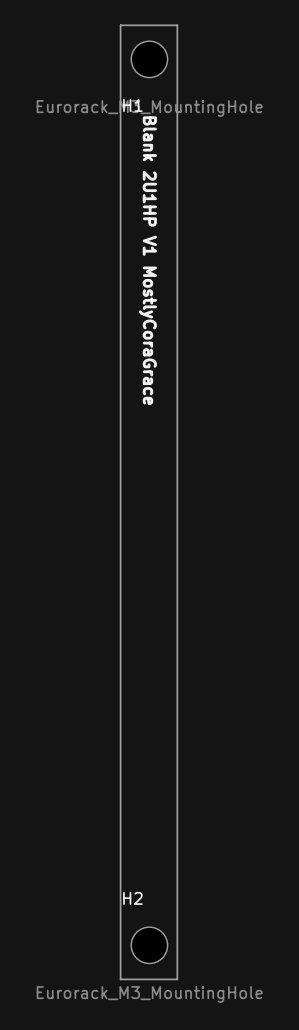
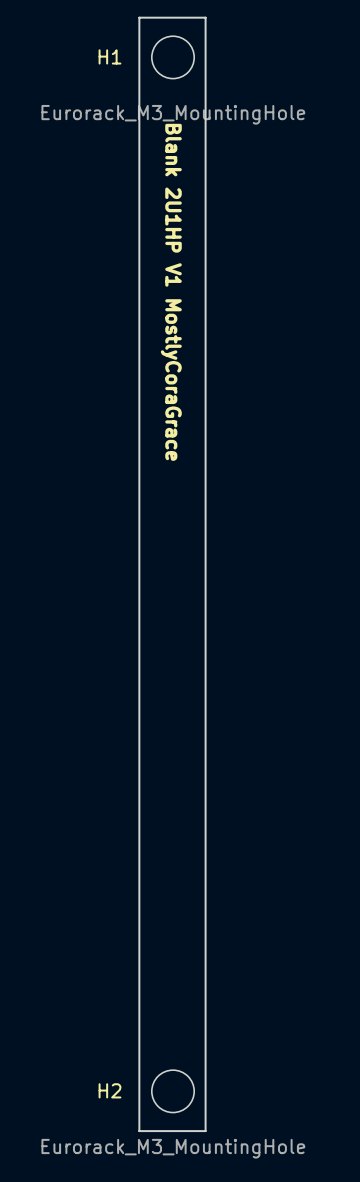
H1 name position: H1 (132, 105) -> H1 (109, 56)
H2 name position: H2 (132, 898) -> H2 (109, 1090)

